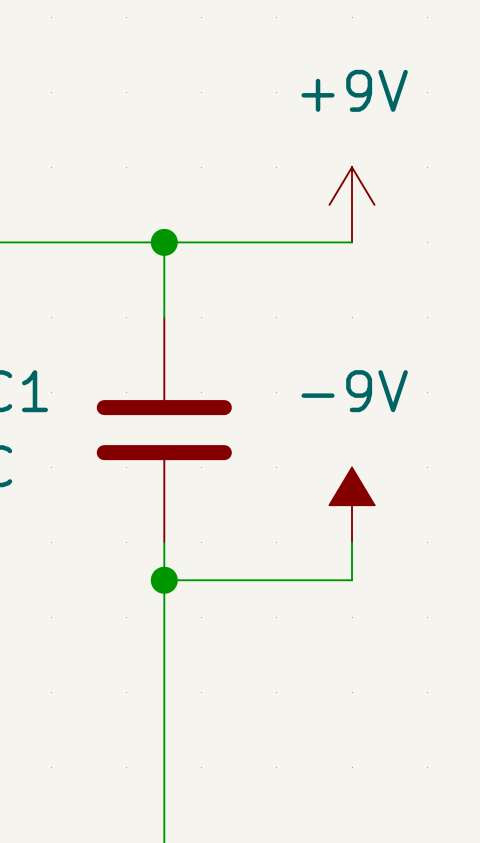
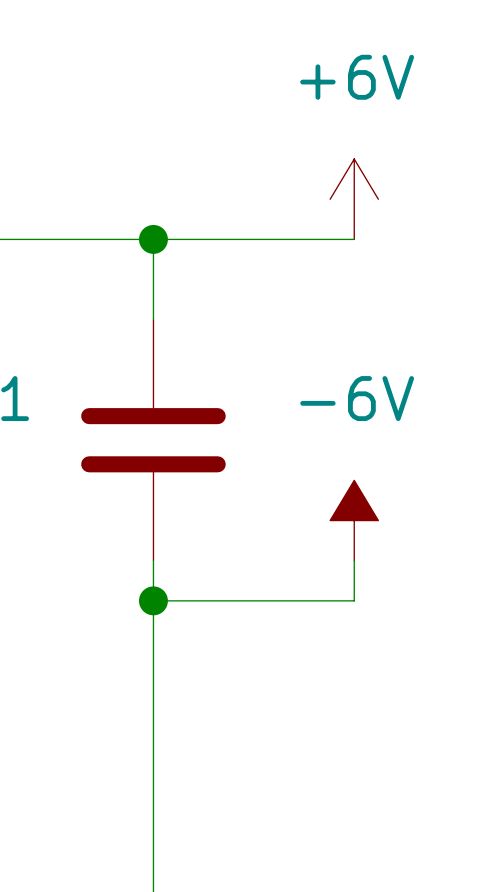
power symbol: +9V (352, 204) -> +6V (354, 199)
power symbol: -9V (352, 505) -> -6V (354, 520)

